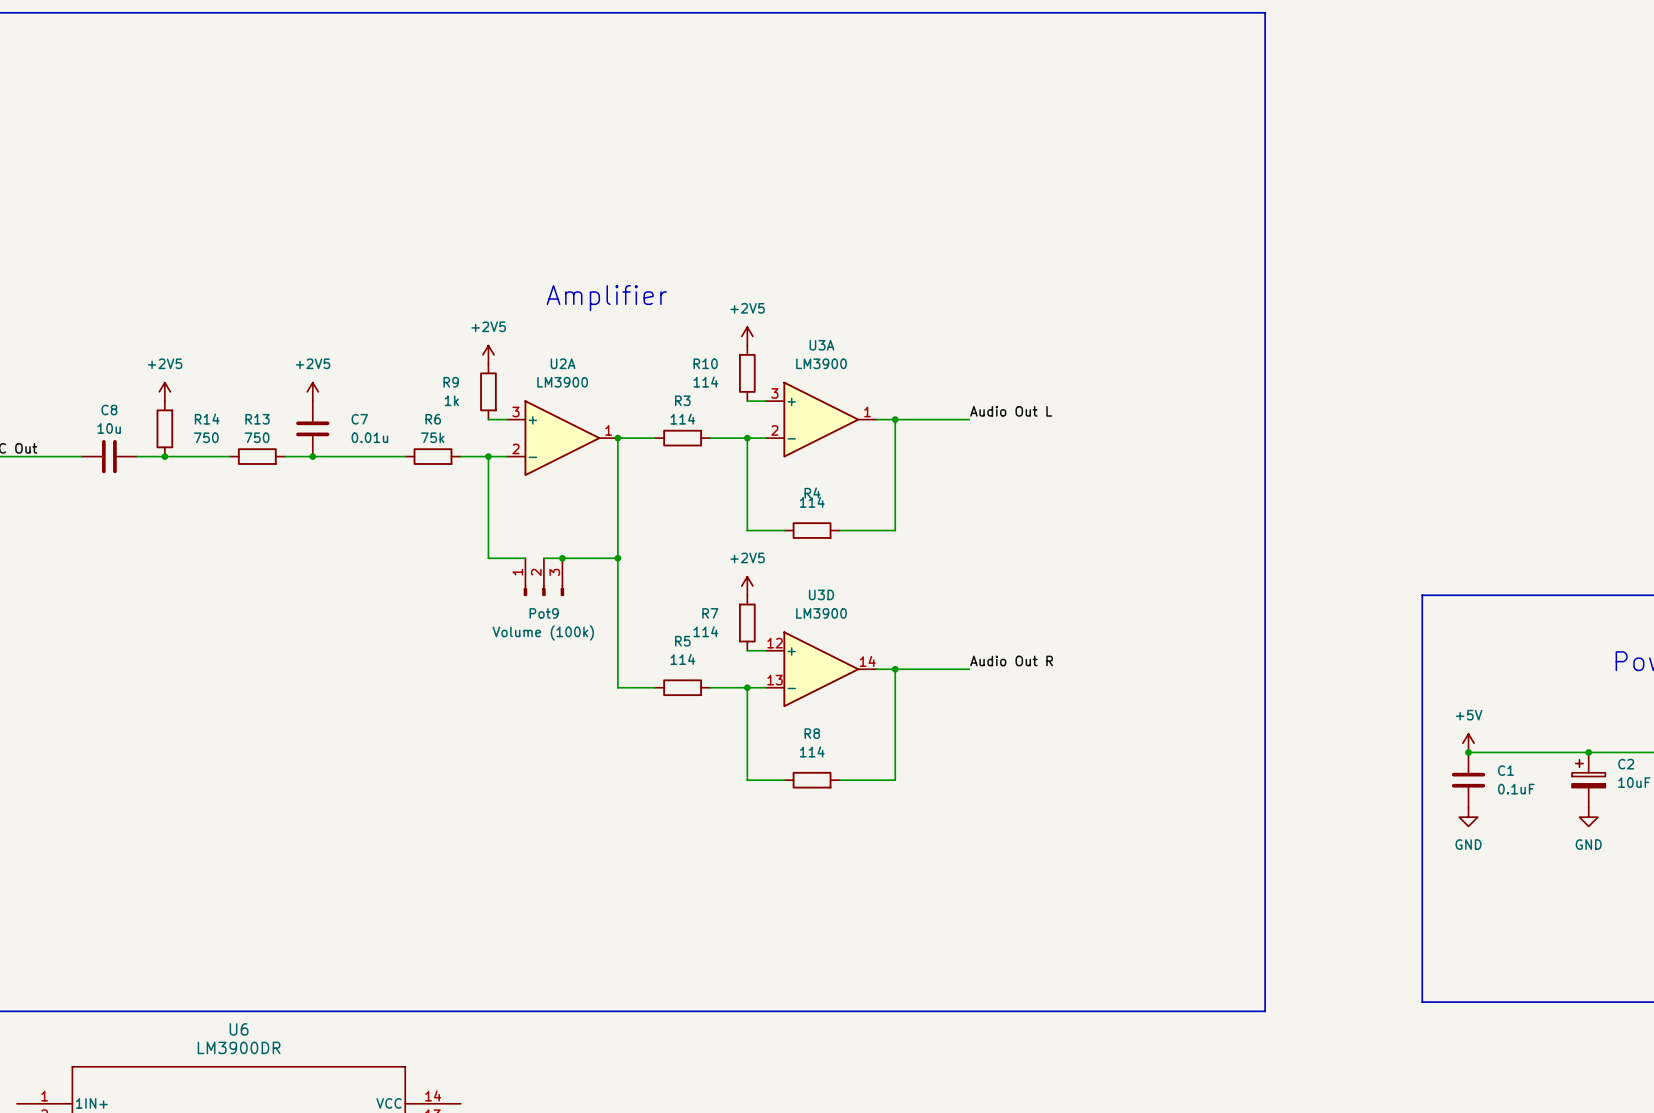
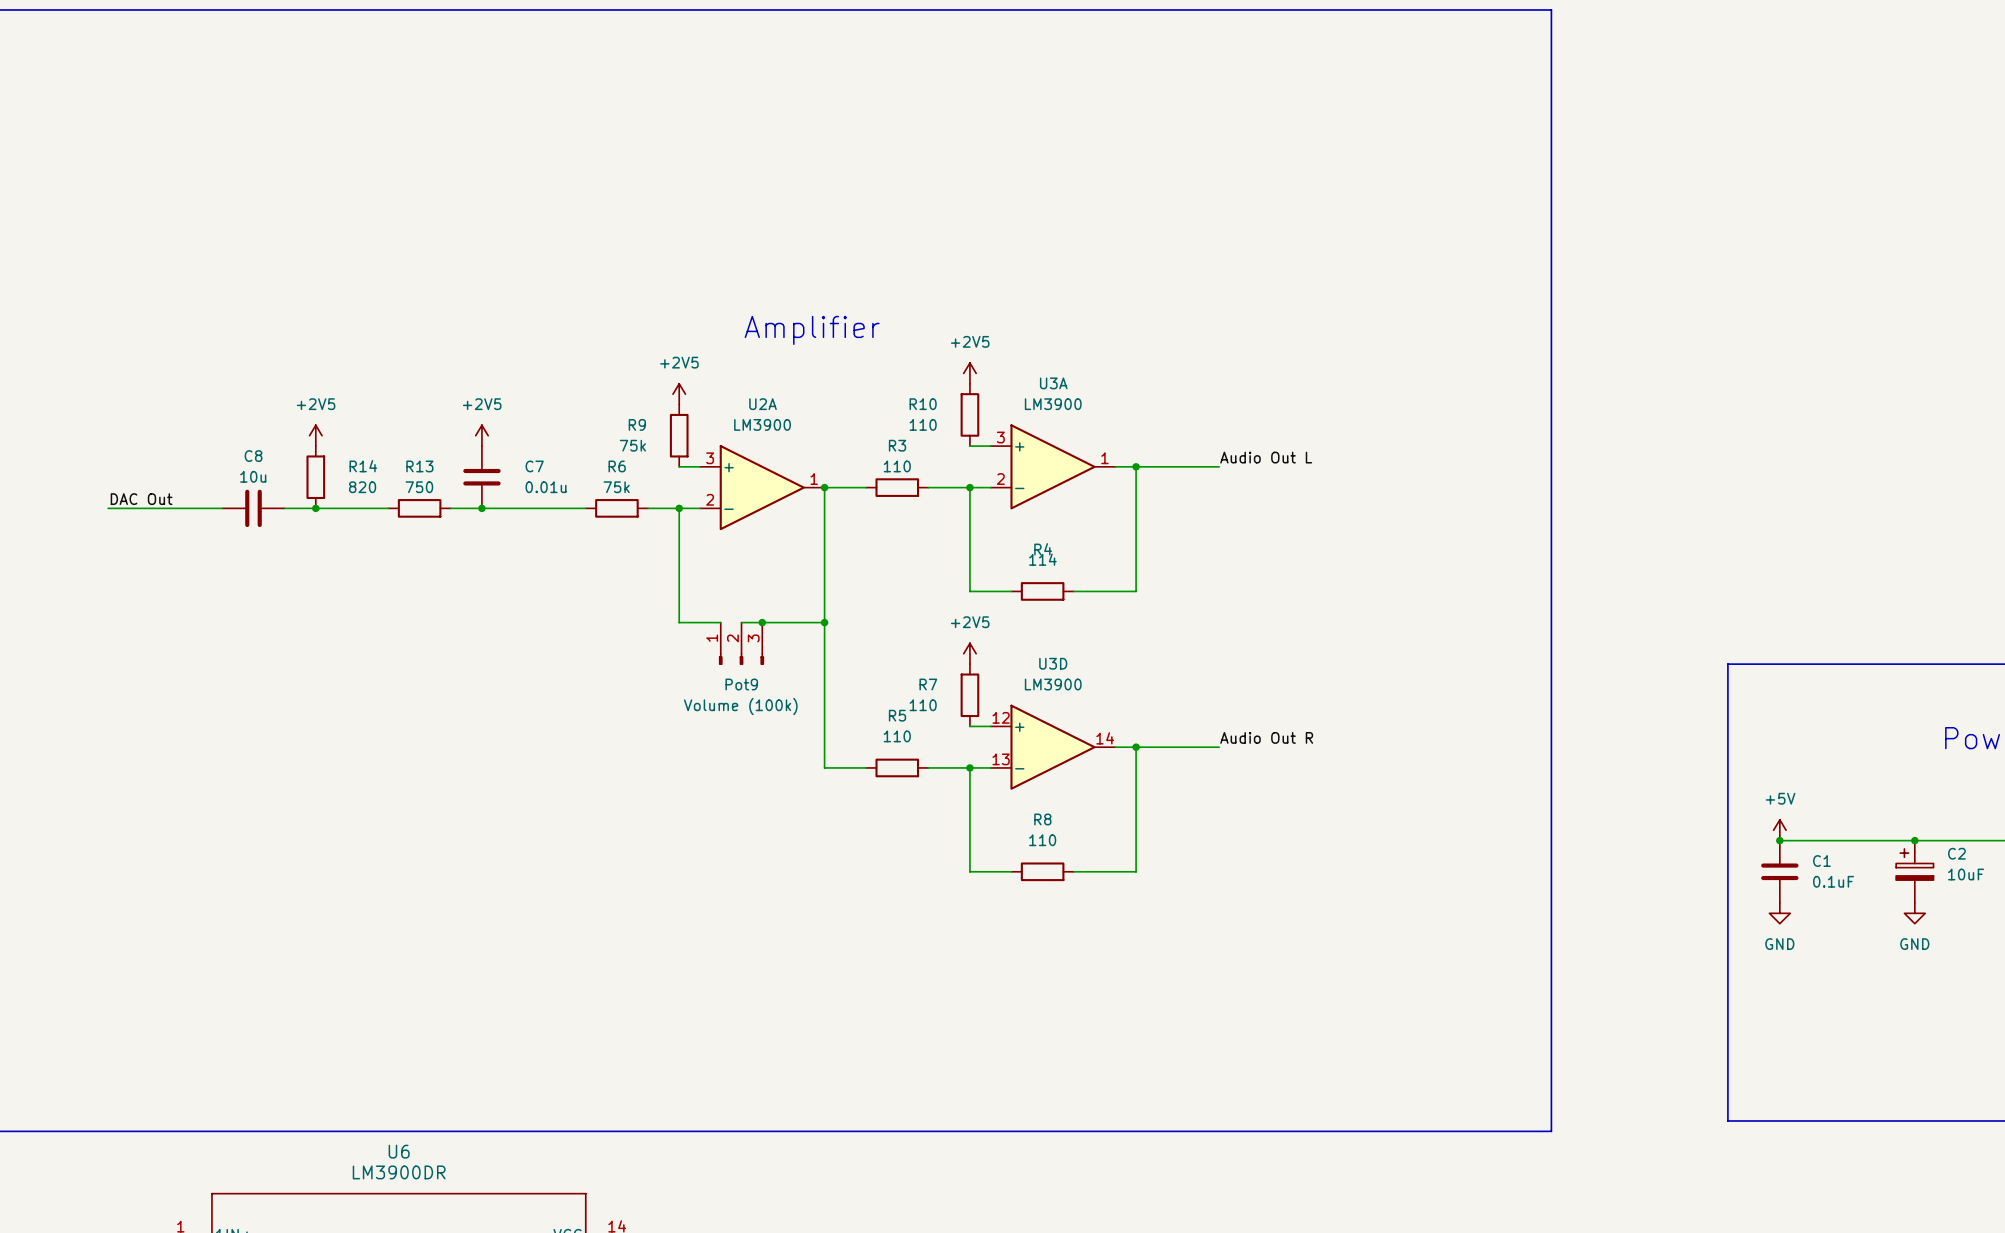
R10 value: 114 (705, 382) -> 110 (923, 424)
R9 value: 1k (451, 400) -> 75k (632, 445)
R3 value: 114 (682, 419) -> 110 (897, 466)
R14 value: 750 (206, 437) -> 820 (362, 487)
R7 value: 114 (705, 631) -> 110 (923, 705)
R5 value: 114 (682, 659) -> 110 (897, 736)
R8 value: 114 (812, 751) -> 110 (1042, 840)

